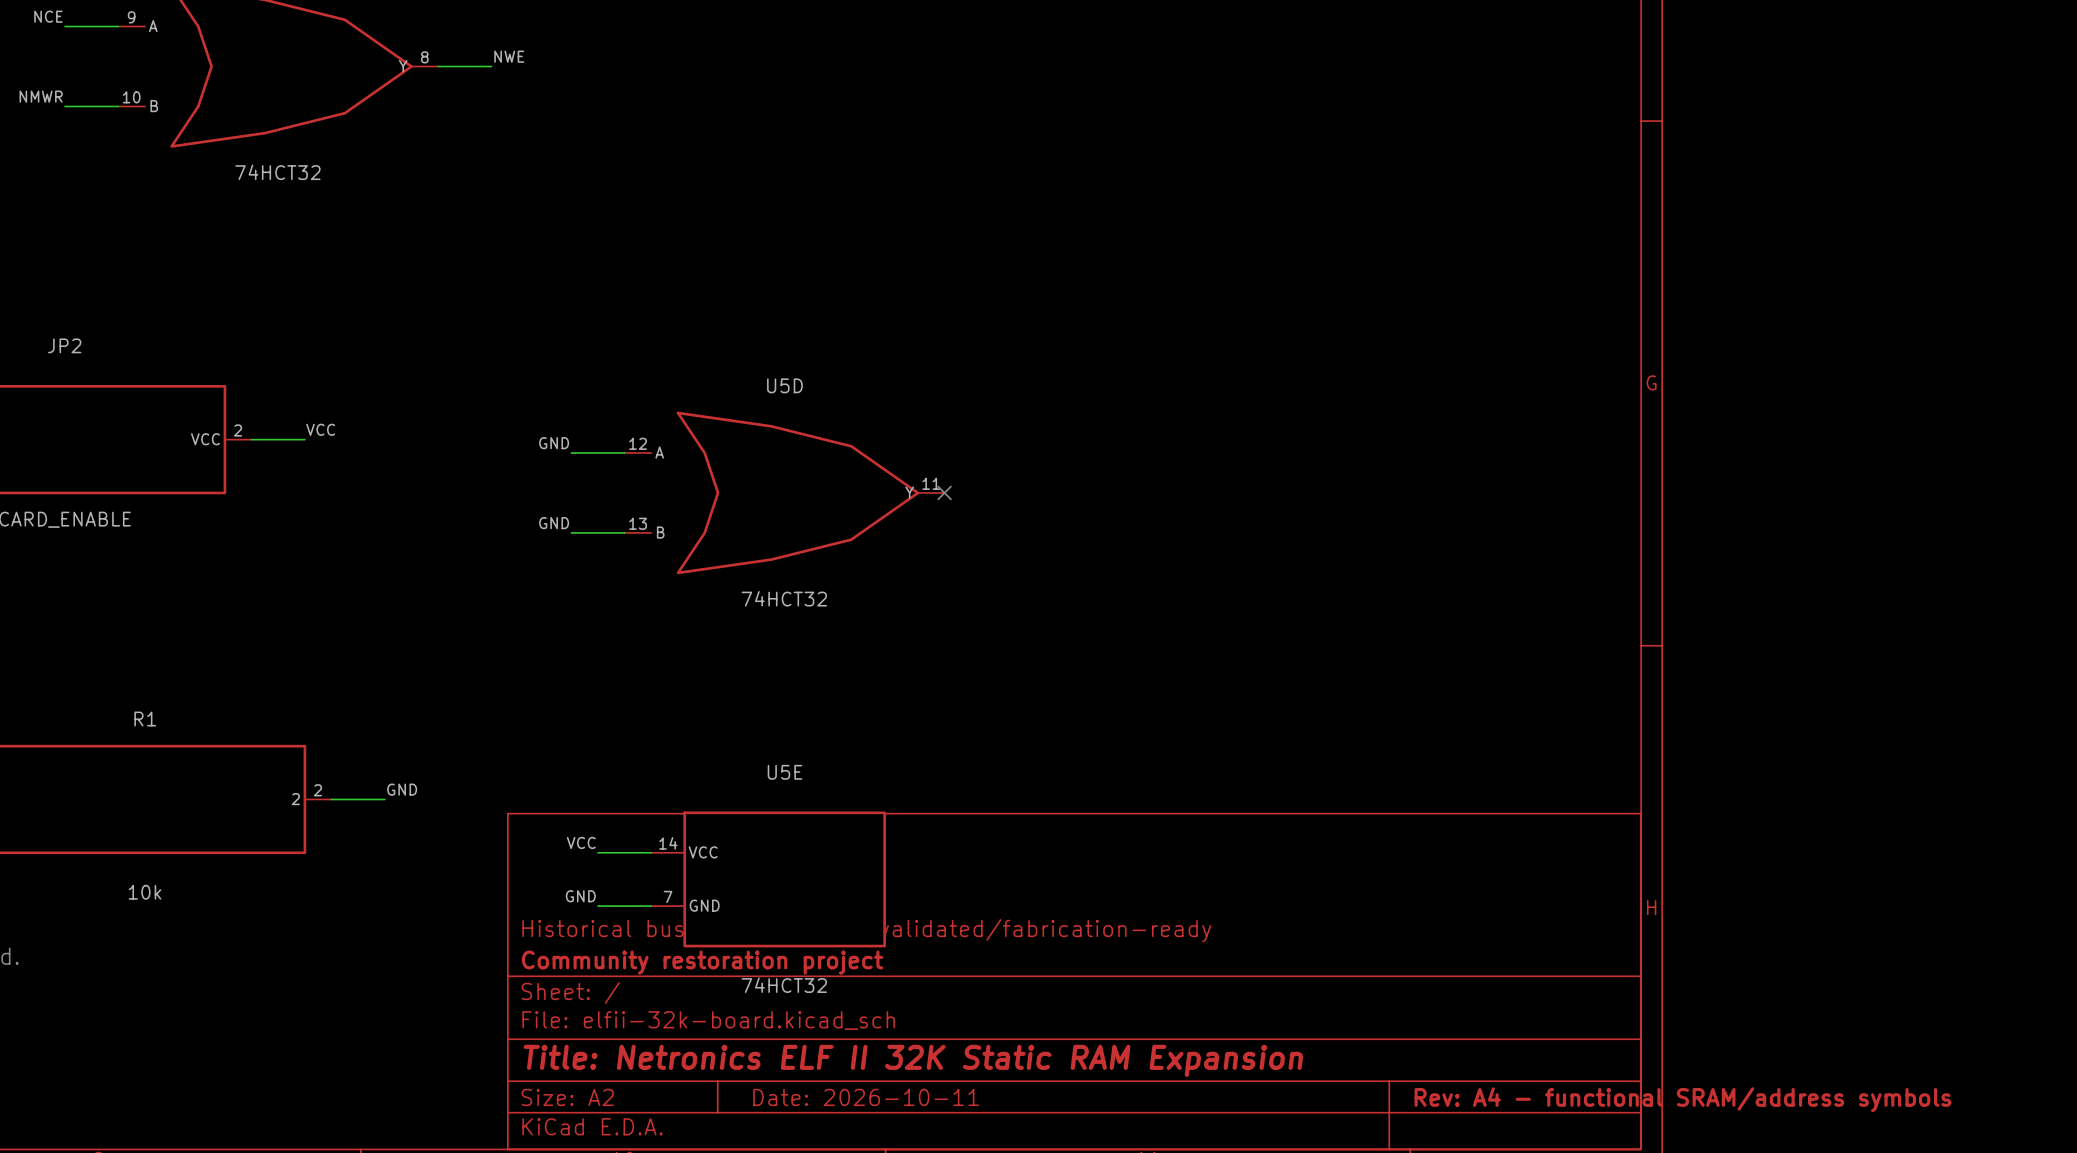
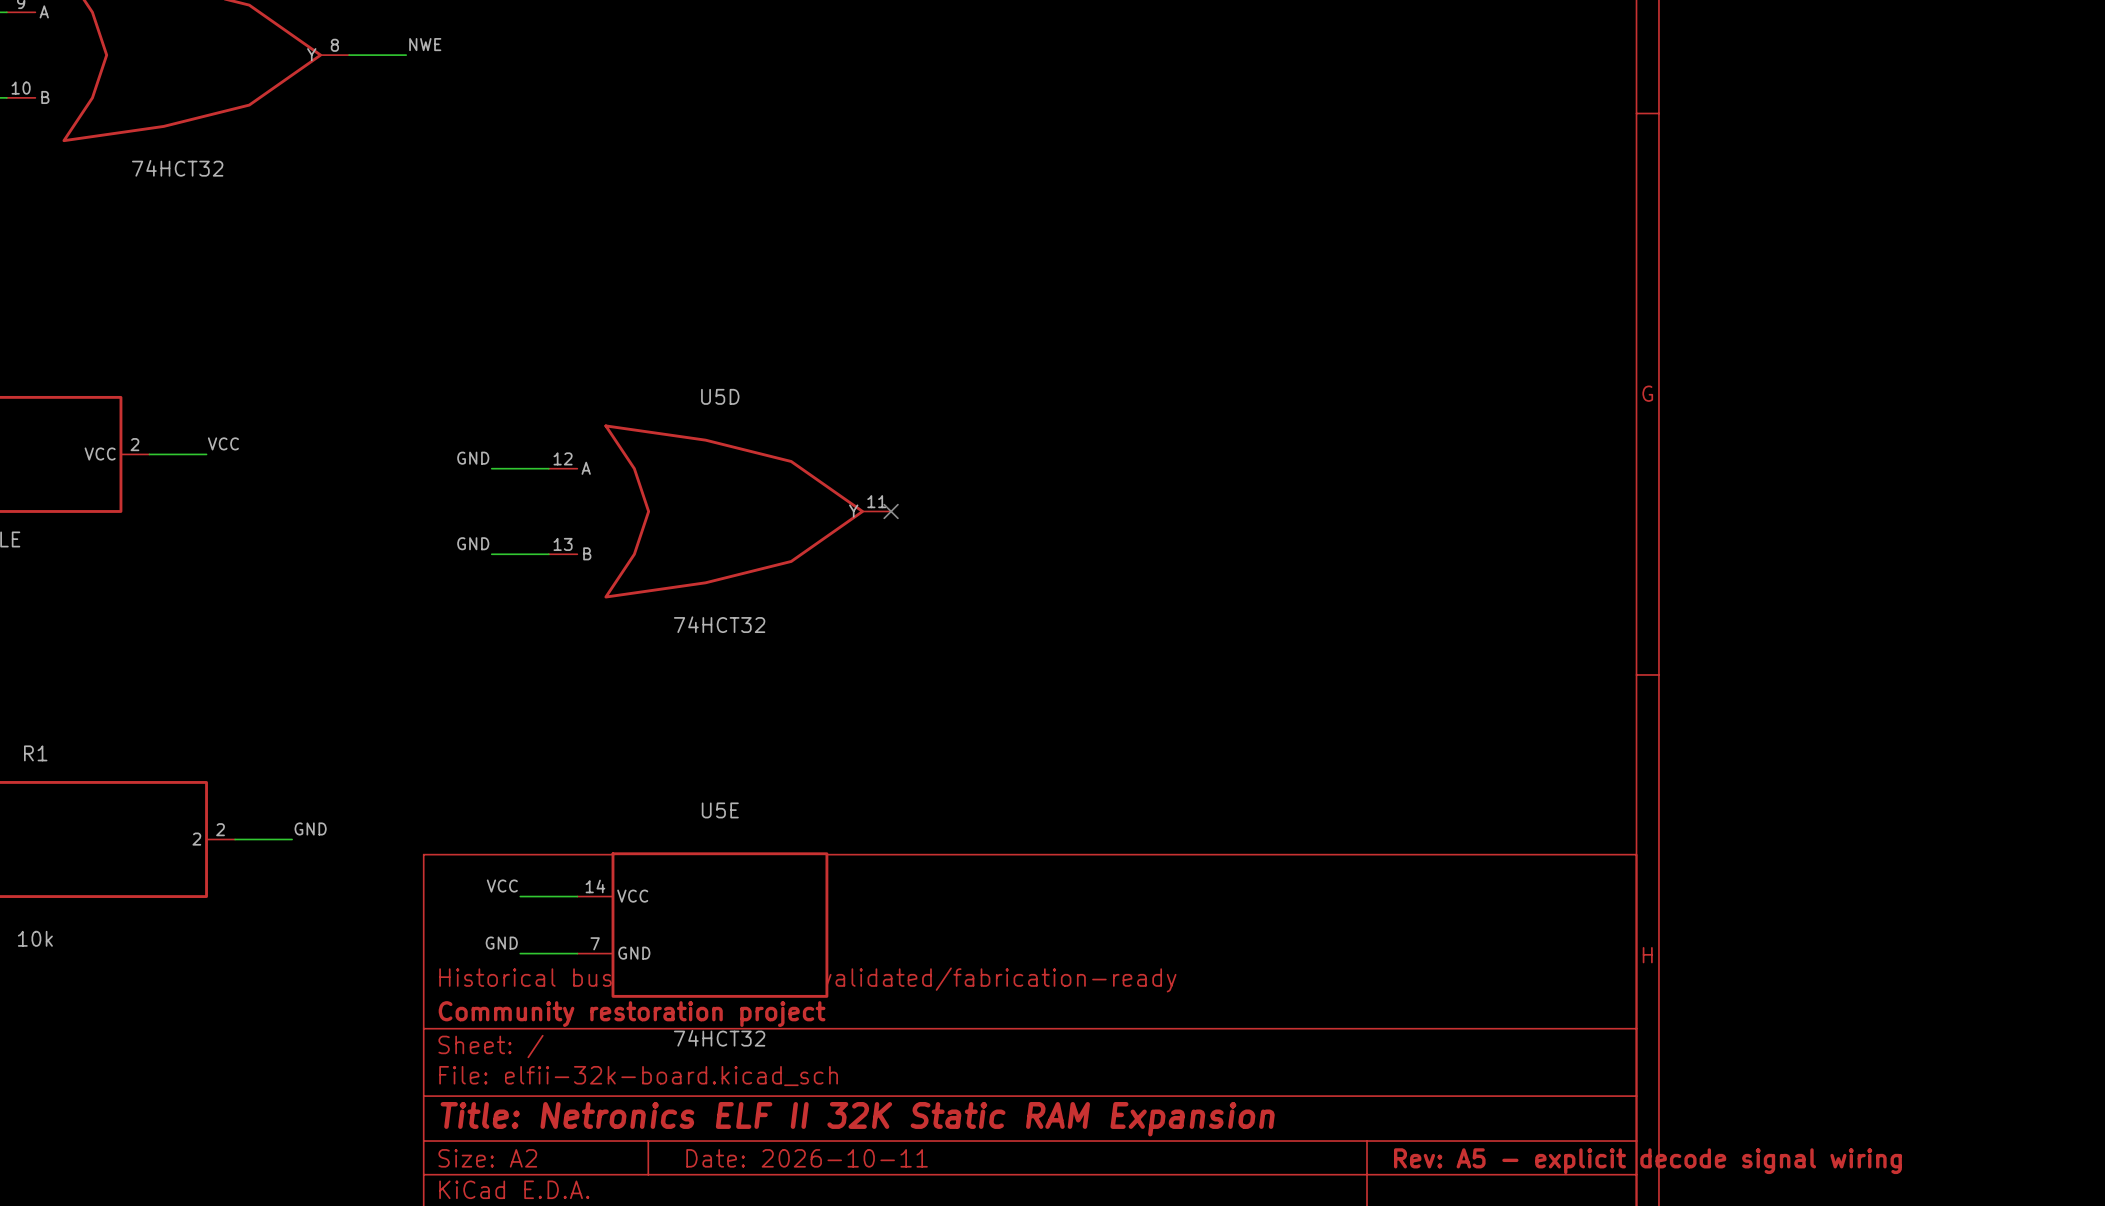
title block: Rev: A4 - functional SRAM/address symbols (1682, 1099) -> Rev: A5 - explicit decode signal wiring (1647, 1161)

